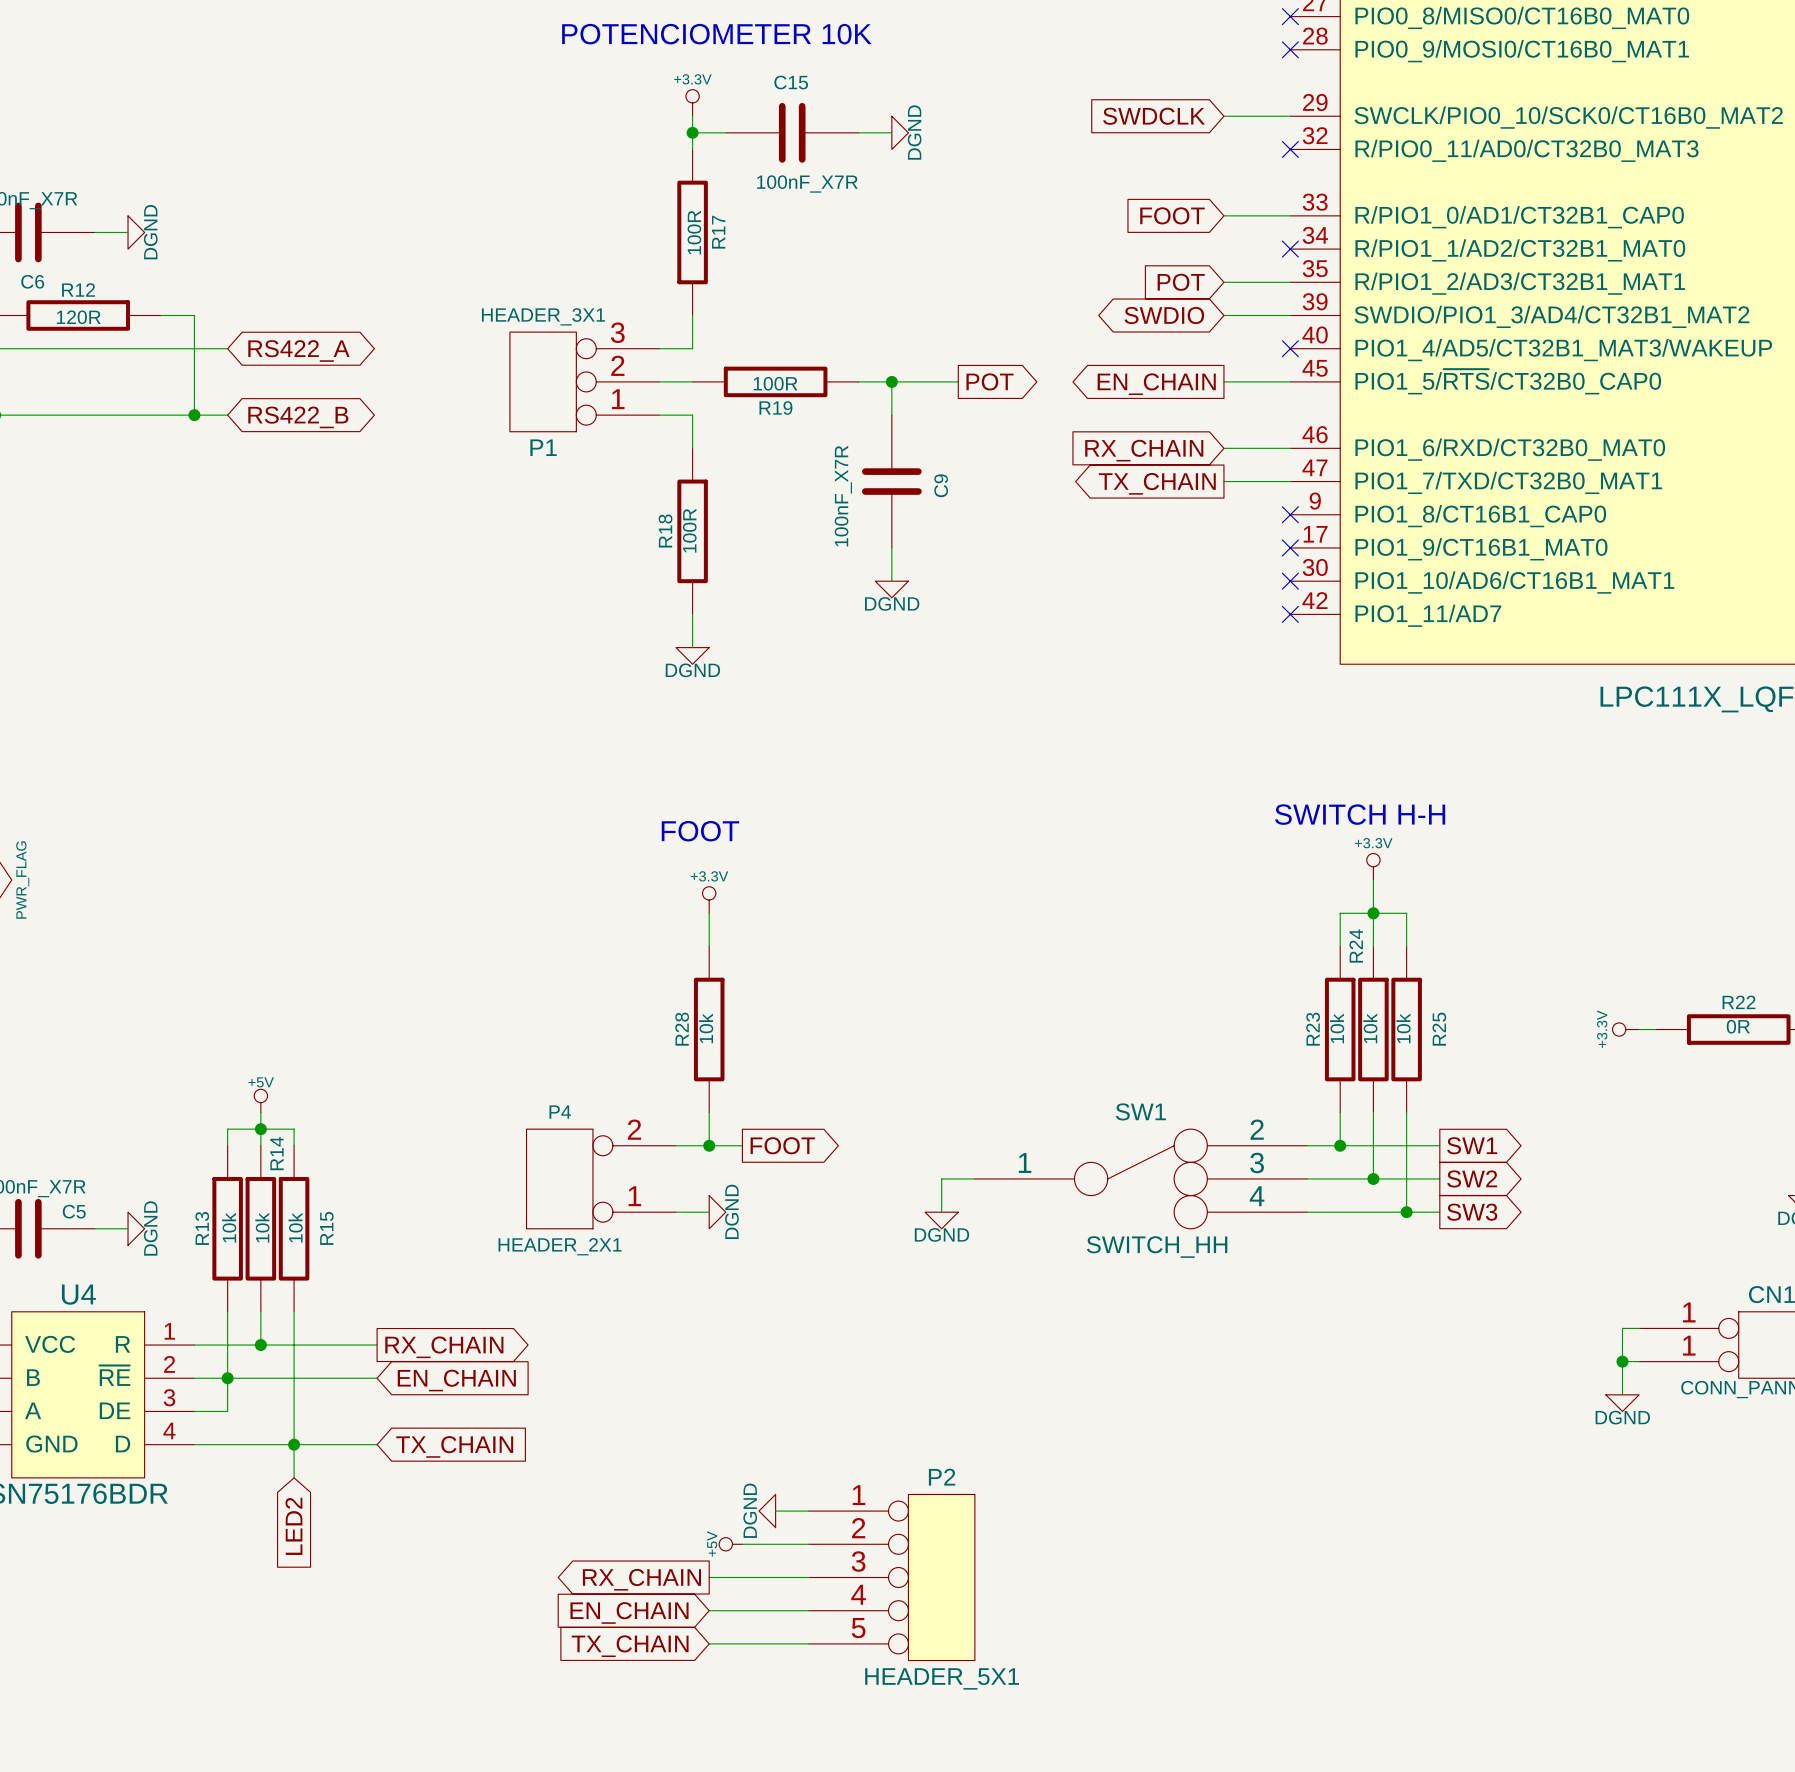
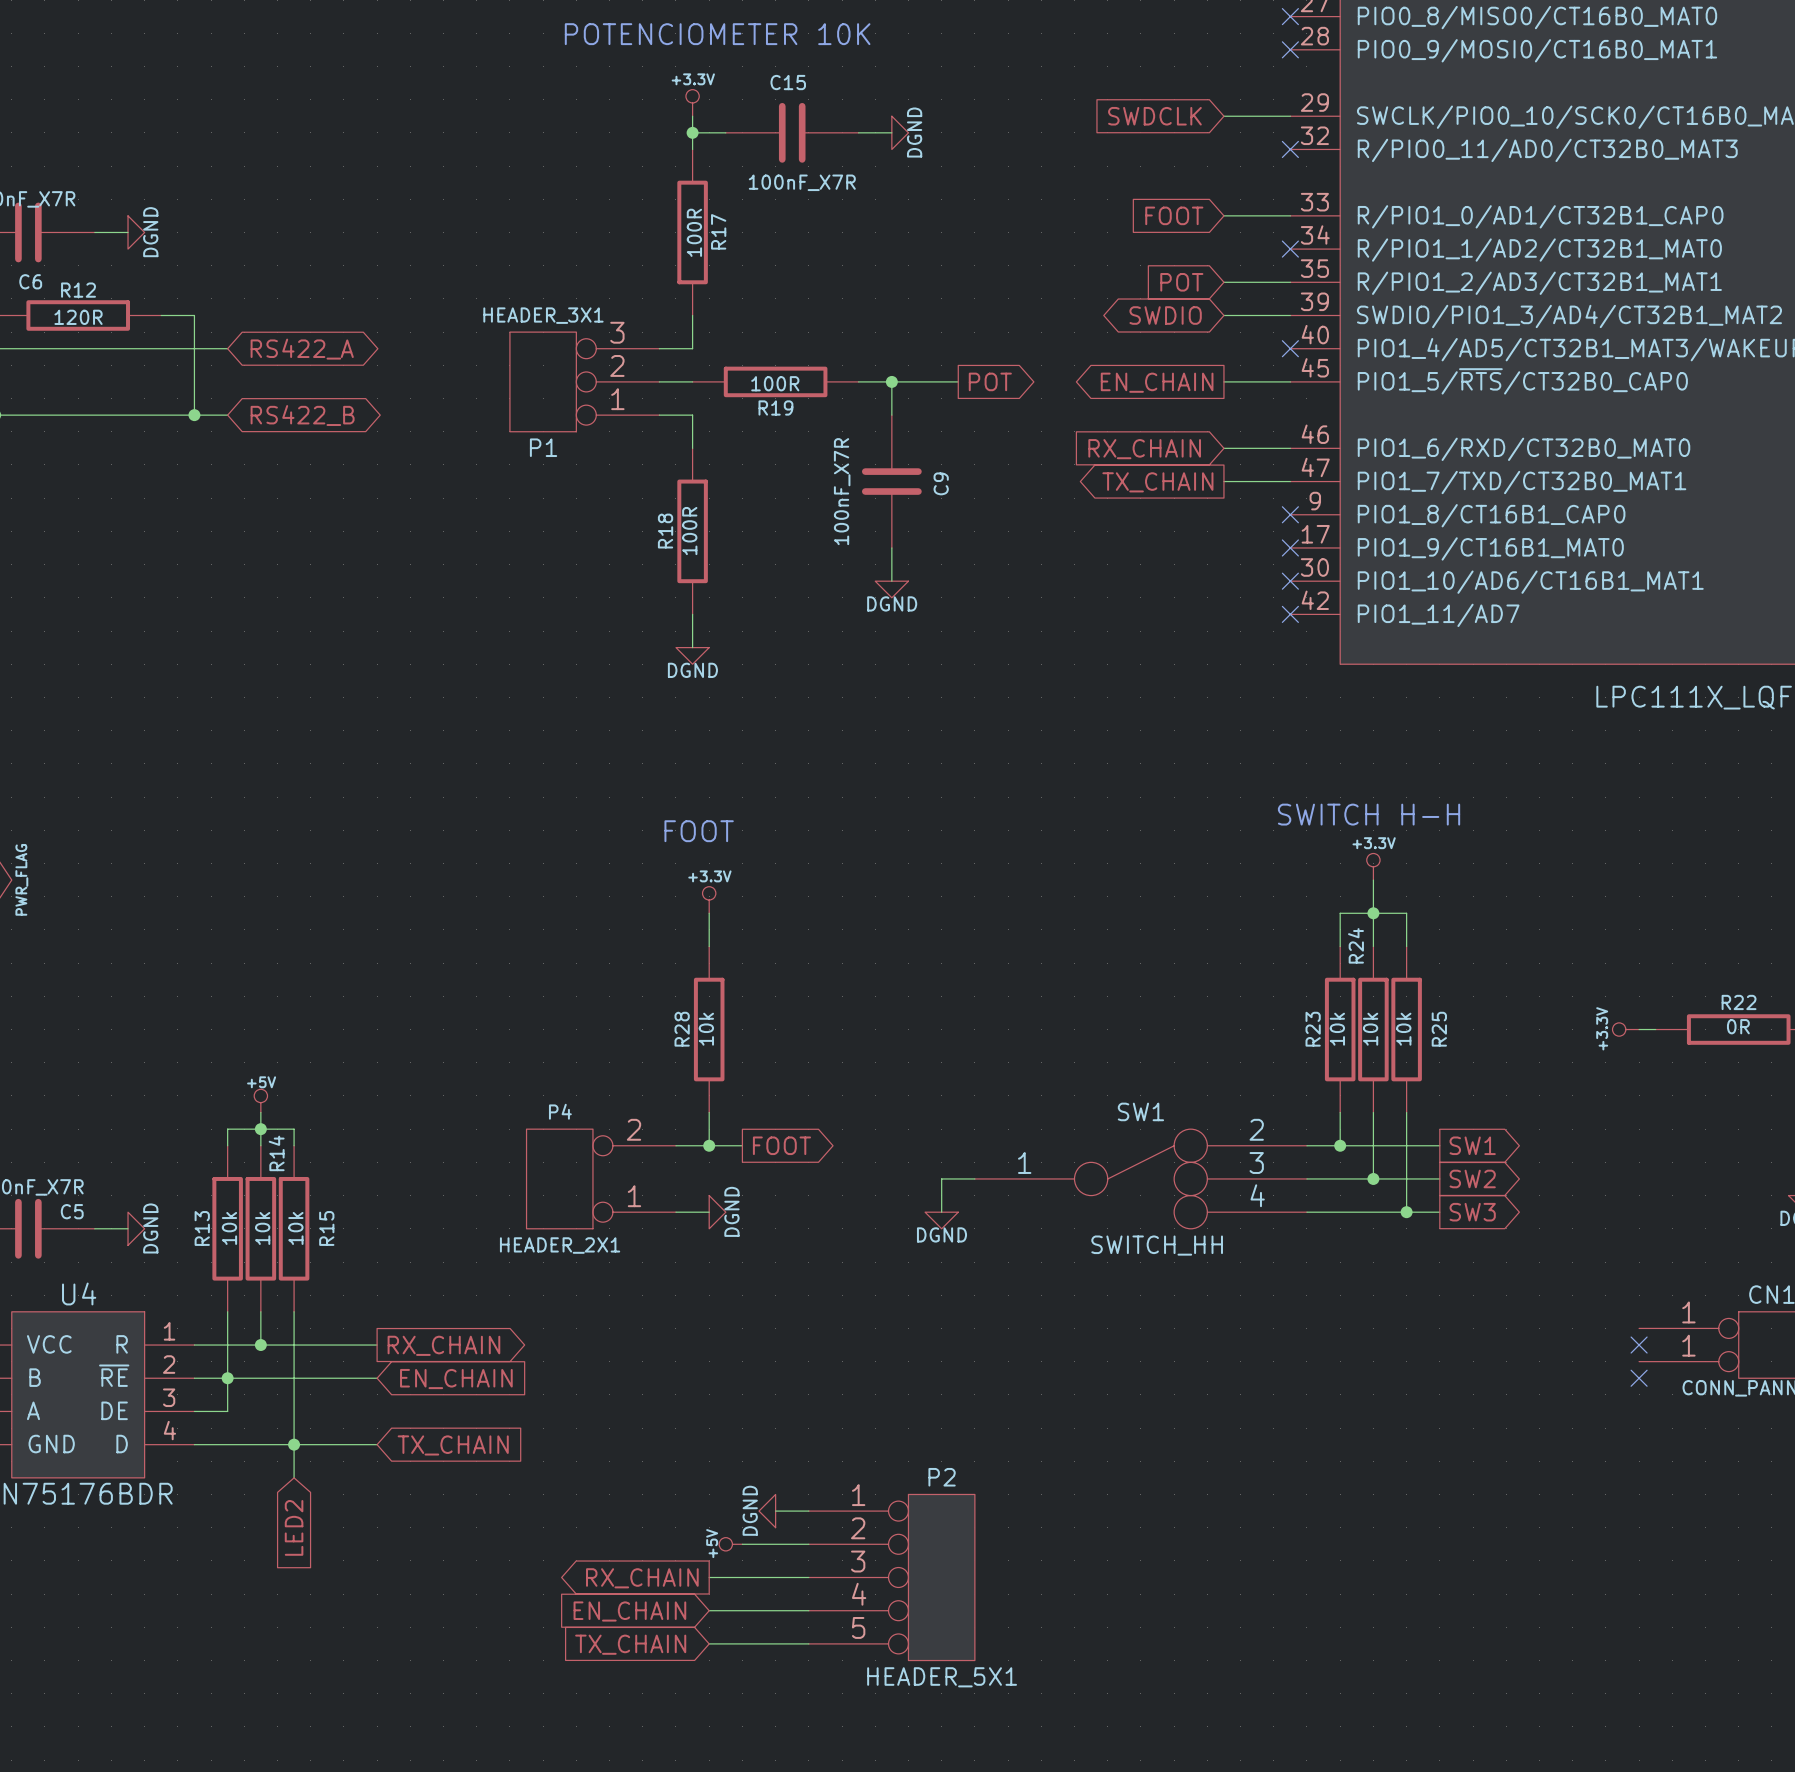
wire: (1639, 1328) (1622, 1328) (1622, 1394) -> none
no-connect mark: none -> (1639, 1345)
wire: (1622, 1361) (1639, 1361) -> none
junction: (1622, 1361) -> none
no-connect mark: none -> (1639, 1378)
power symbol: DGND (1622, 1403) -> none

